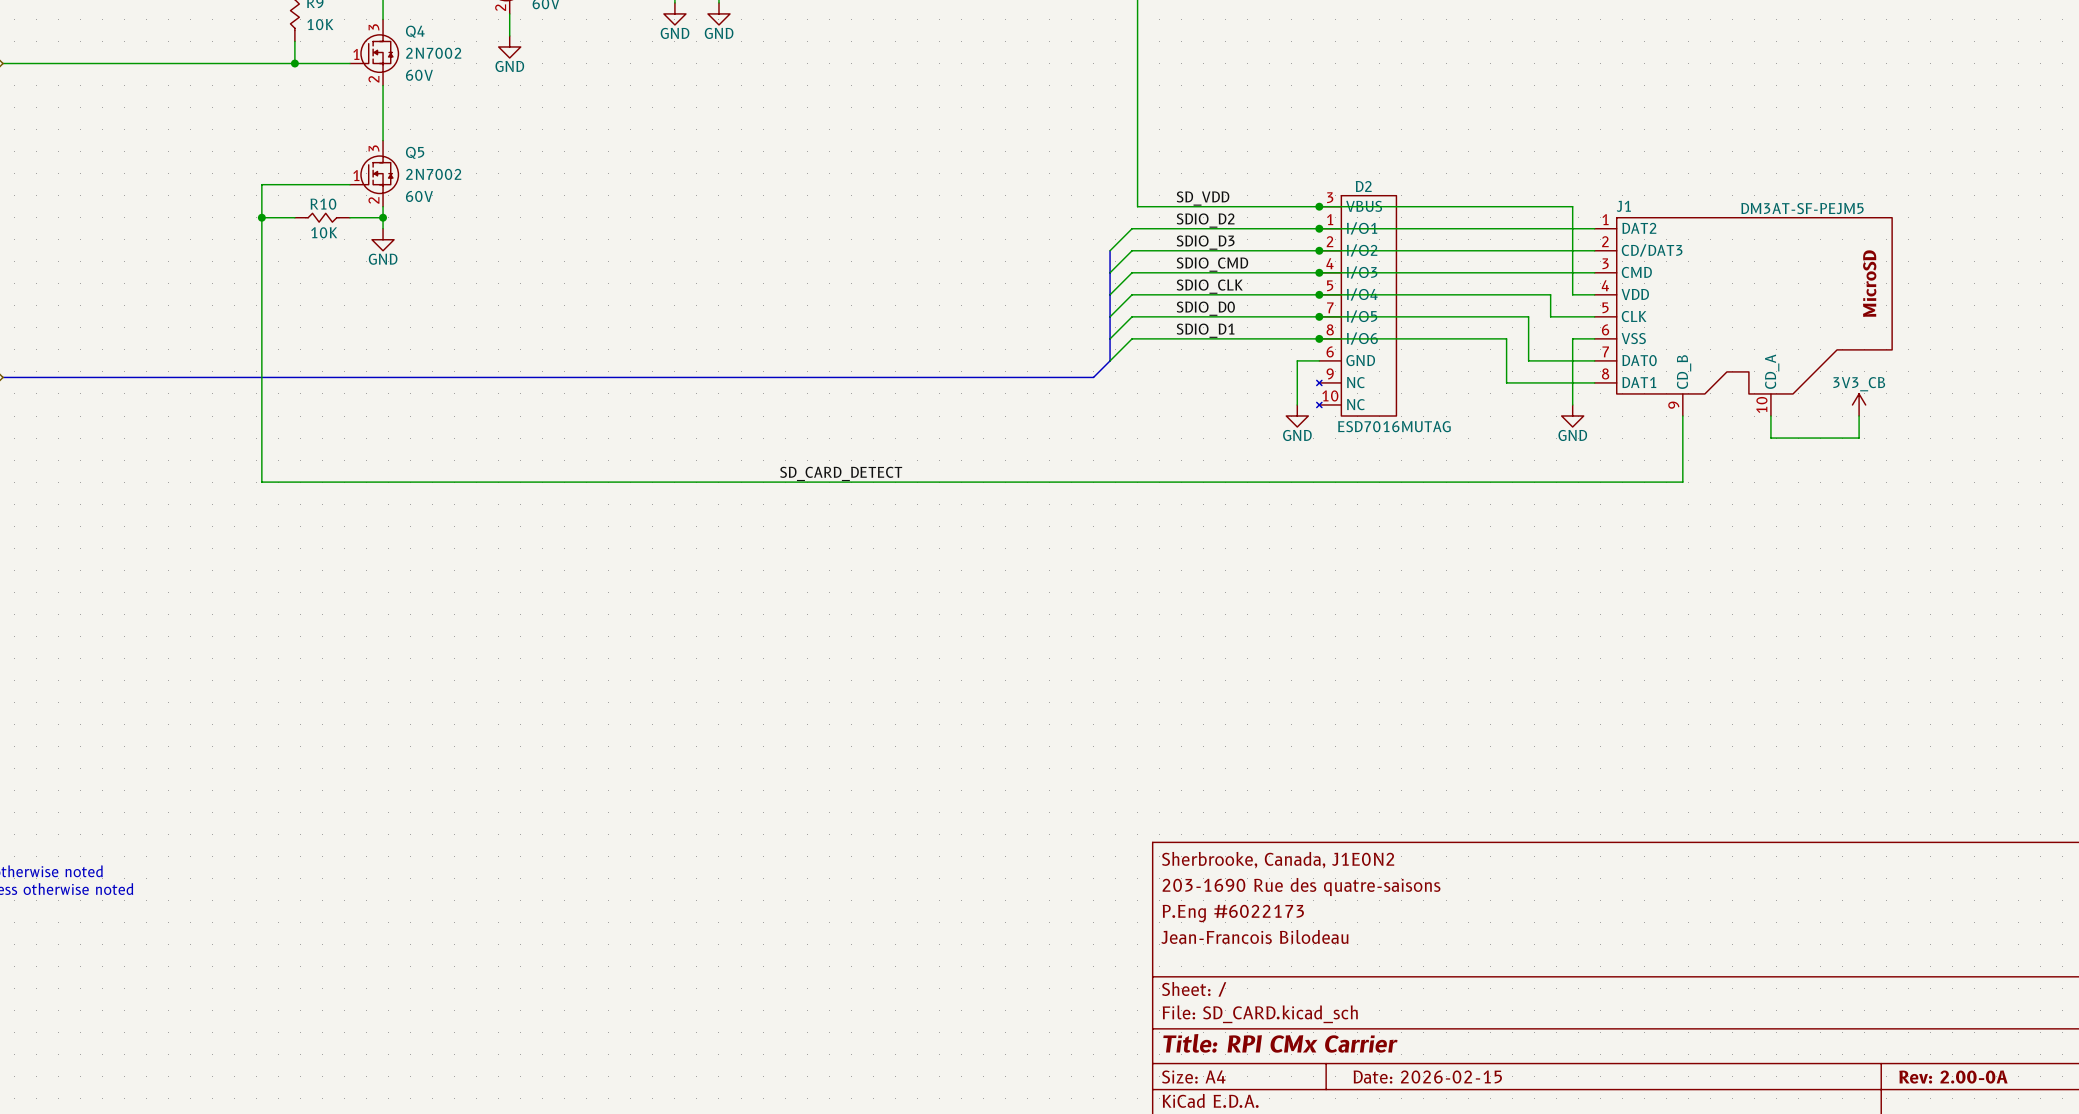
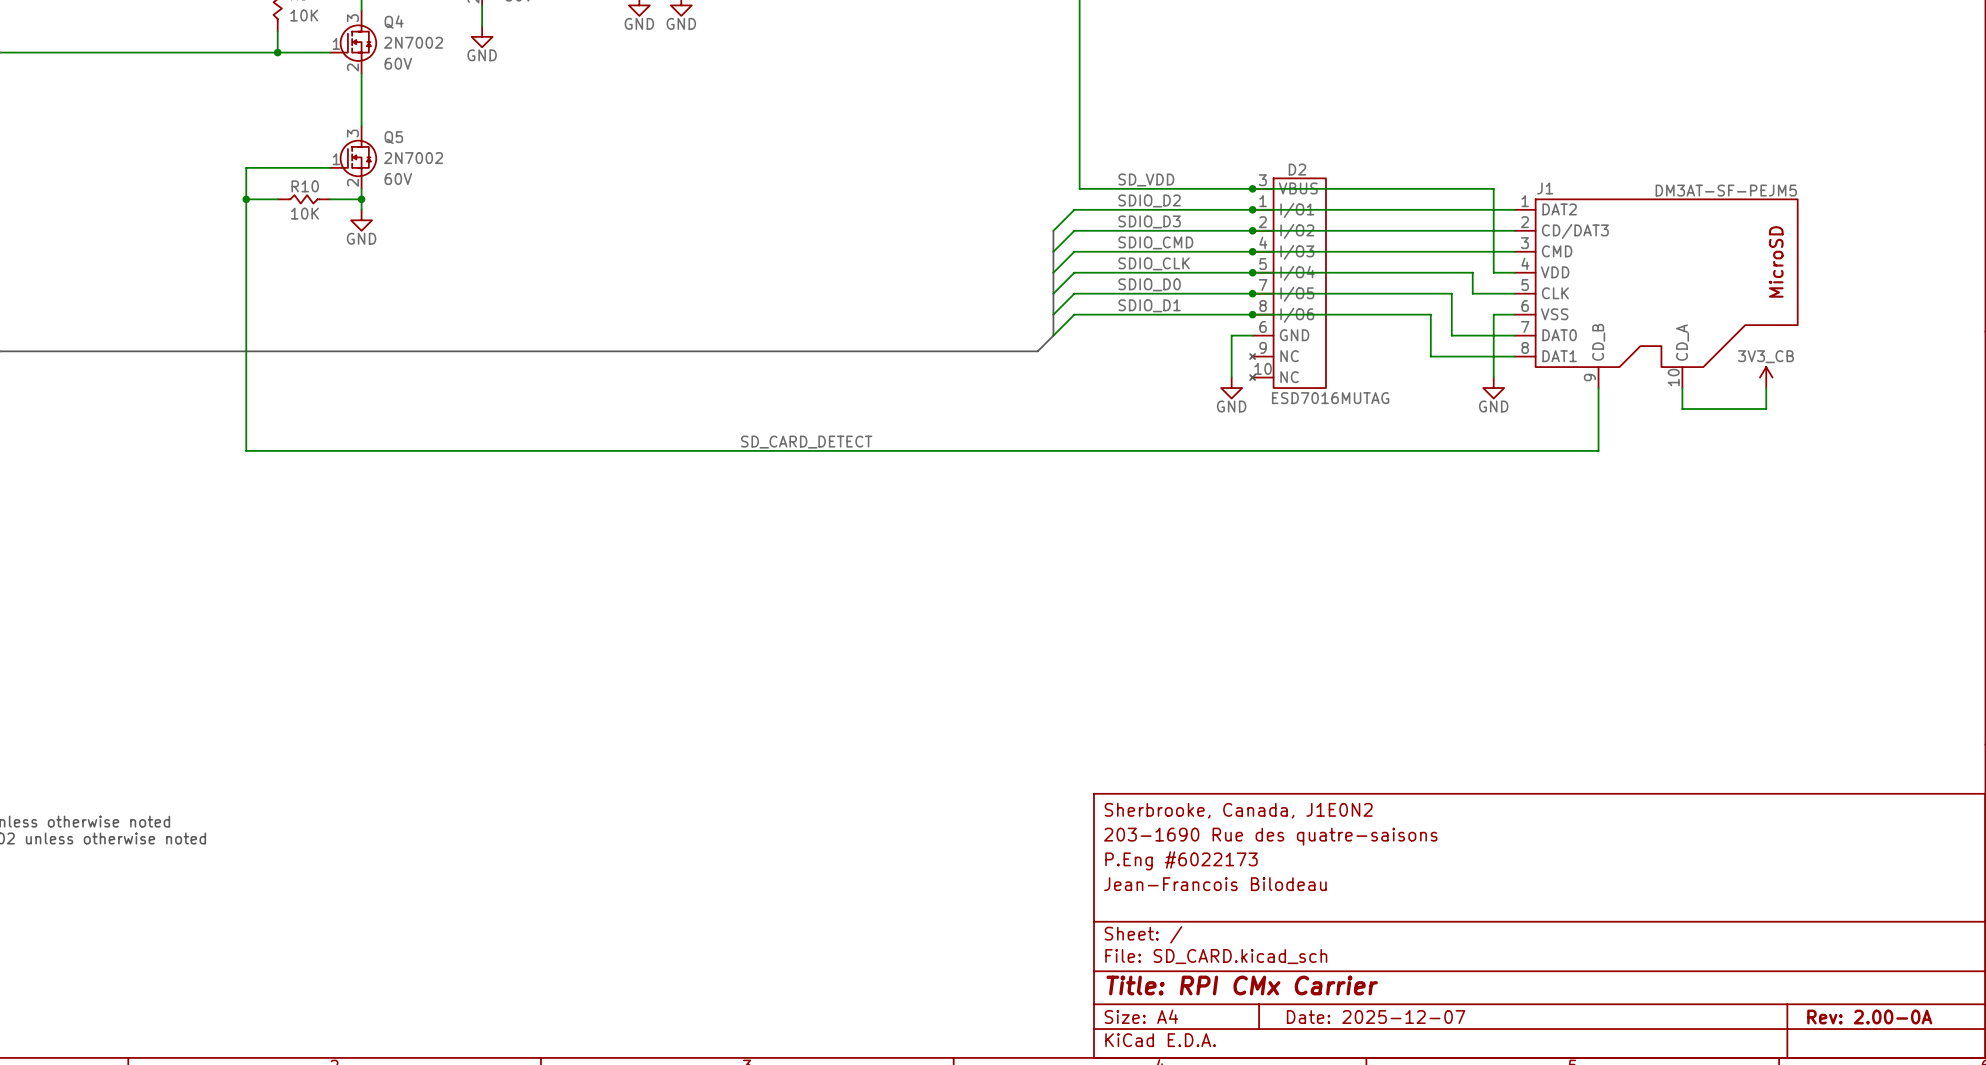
title block: Date: 2026-02-15 (1427, 1077) -> Date: 2025-12-07 (1376, 1017)

